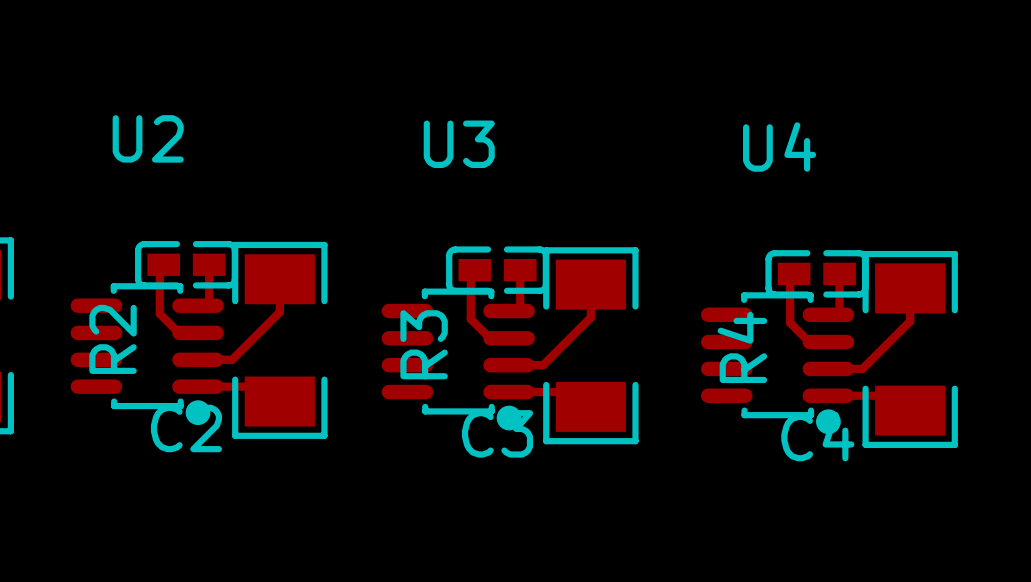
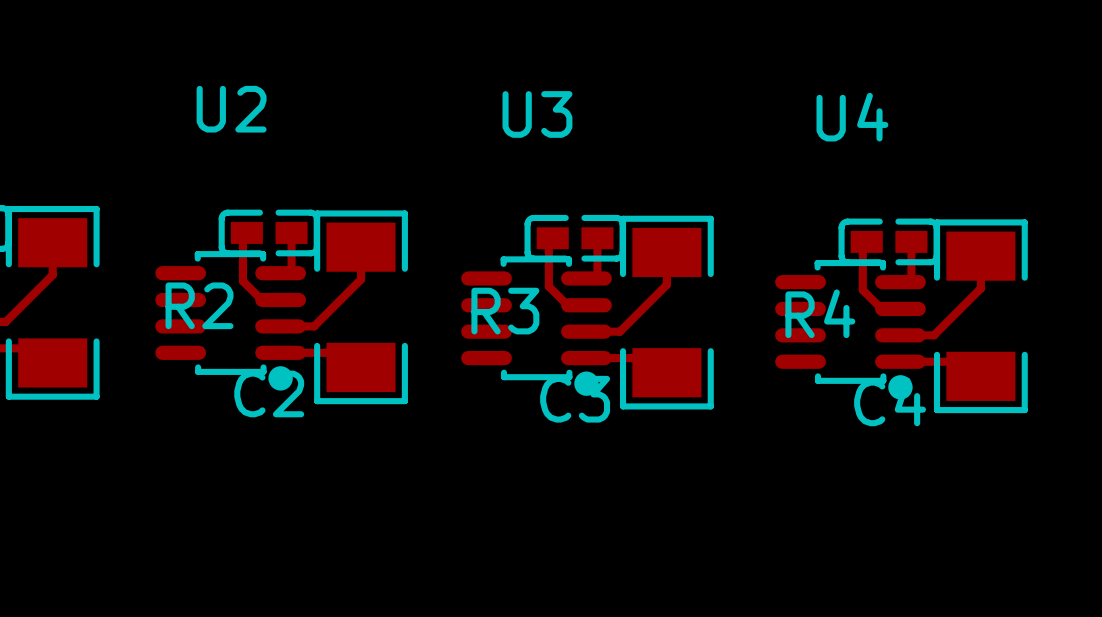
R2 name rotation: 0° (113, 339) -> 90° clockwise (199, 305)
R3 name rotation: 0° (424, 344) -> 90° clockwise (505, 311)
R4 name rotation: 0° (742, 347) -> 90° clockwise (820, 313)

